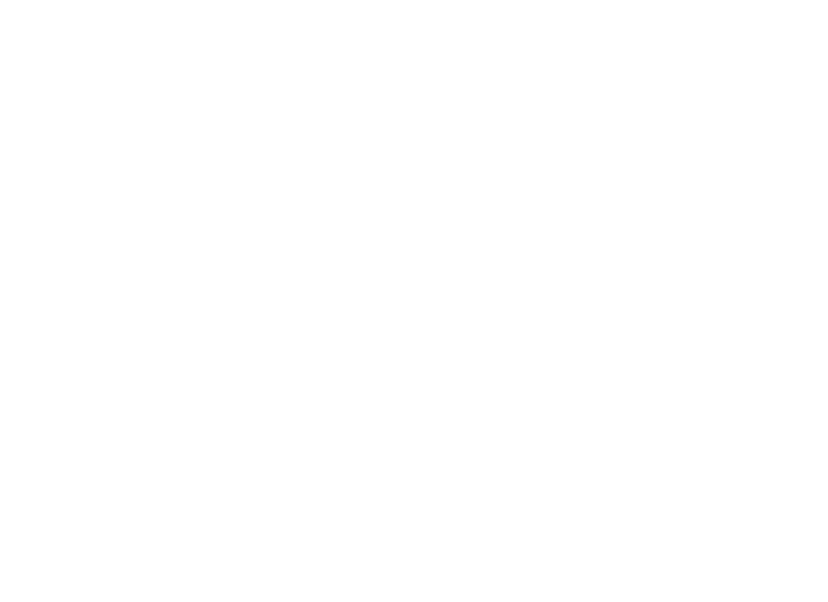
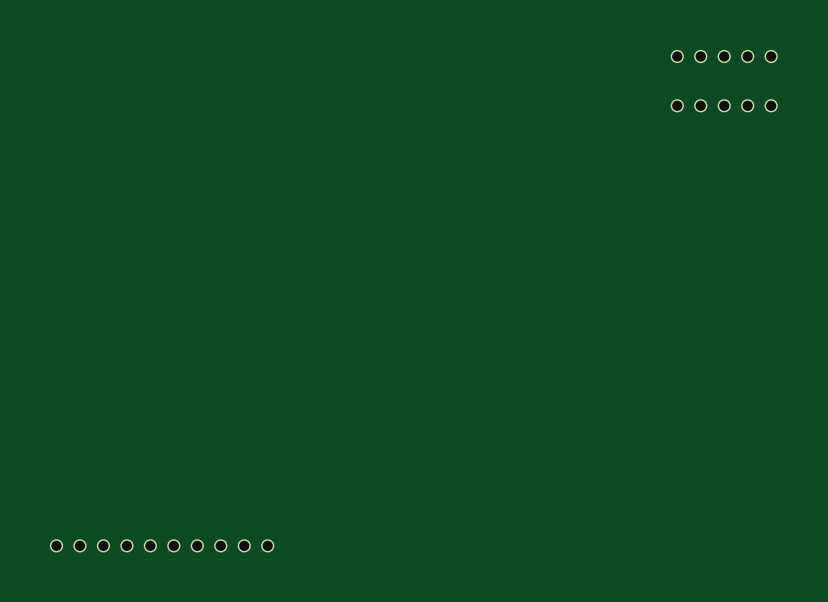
part: none -> (724, 81)
part: none -> (162, 545)

